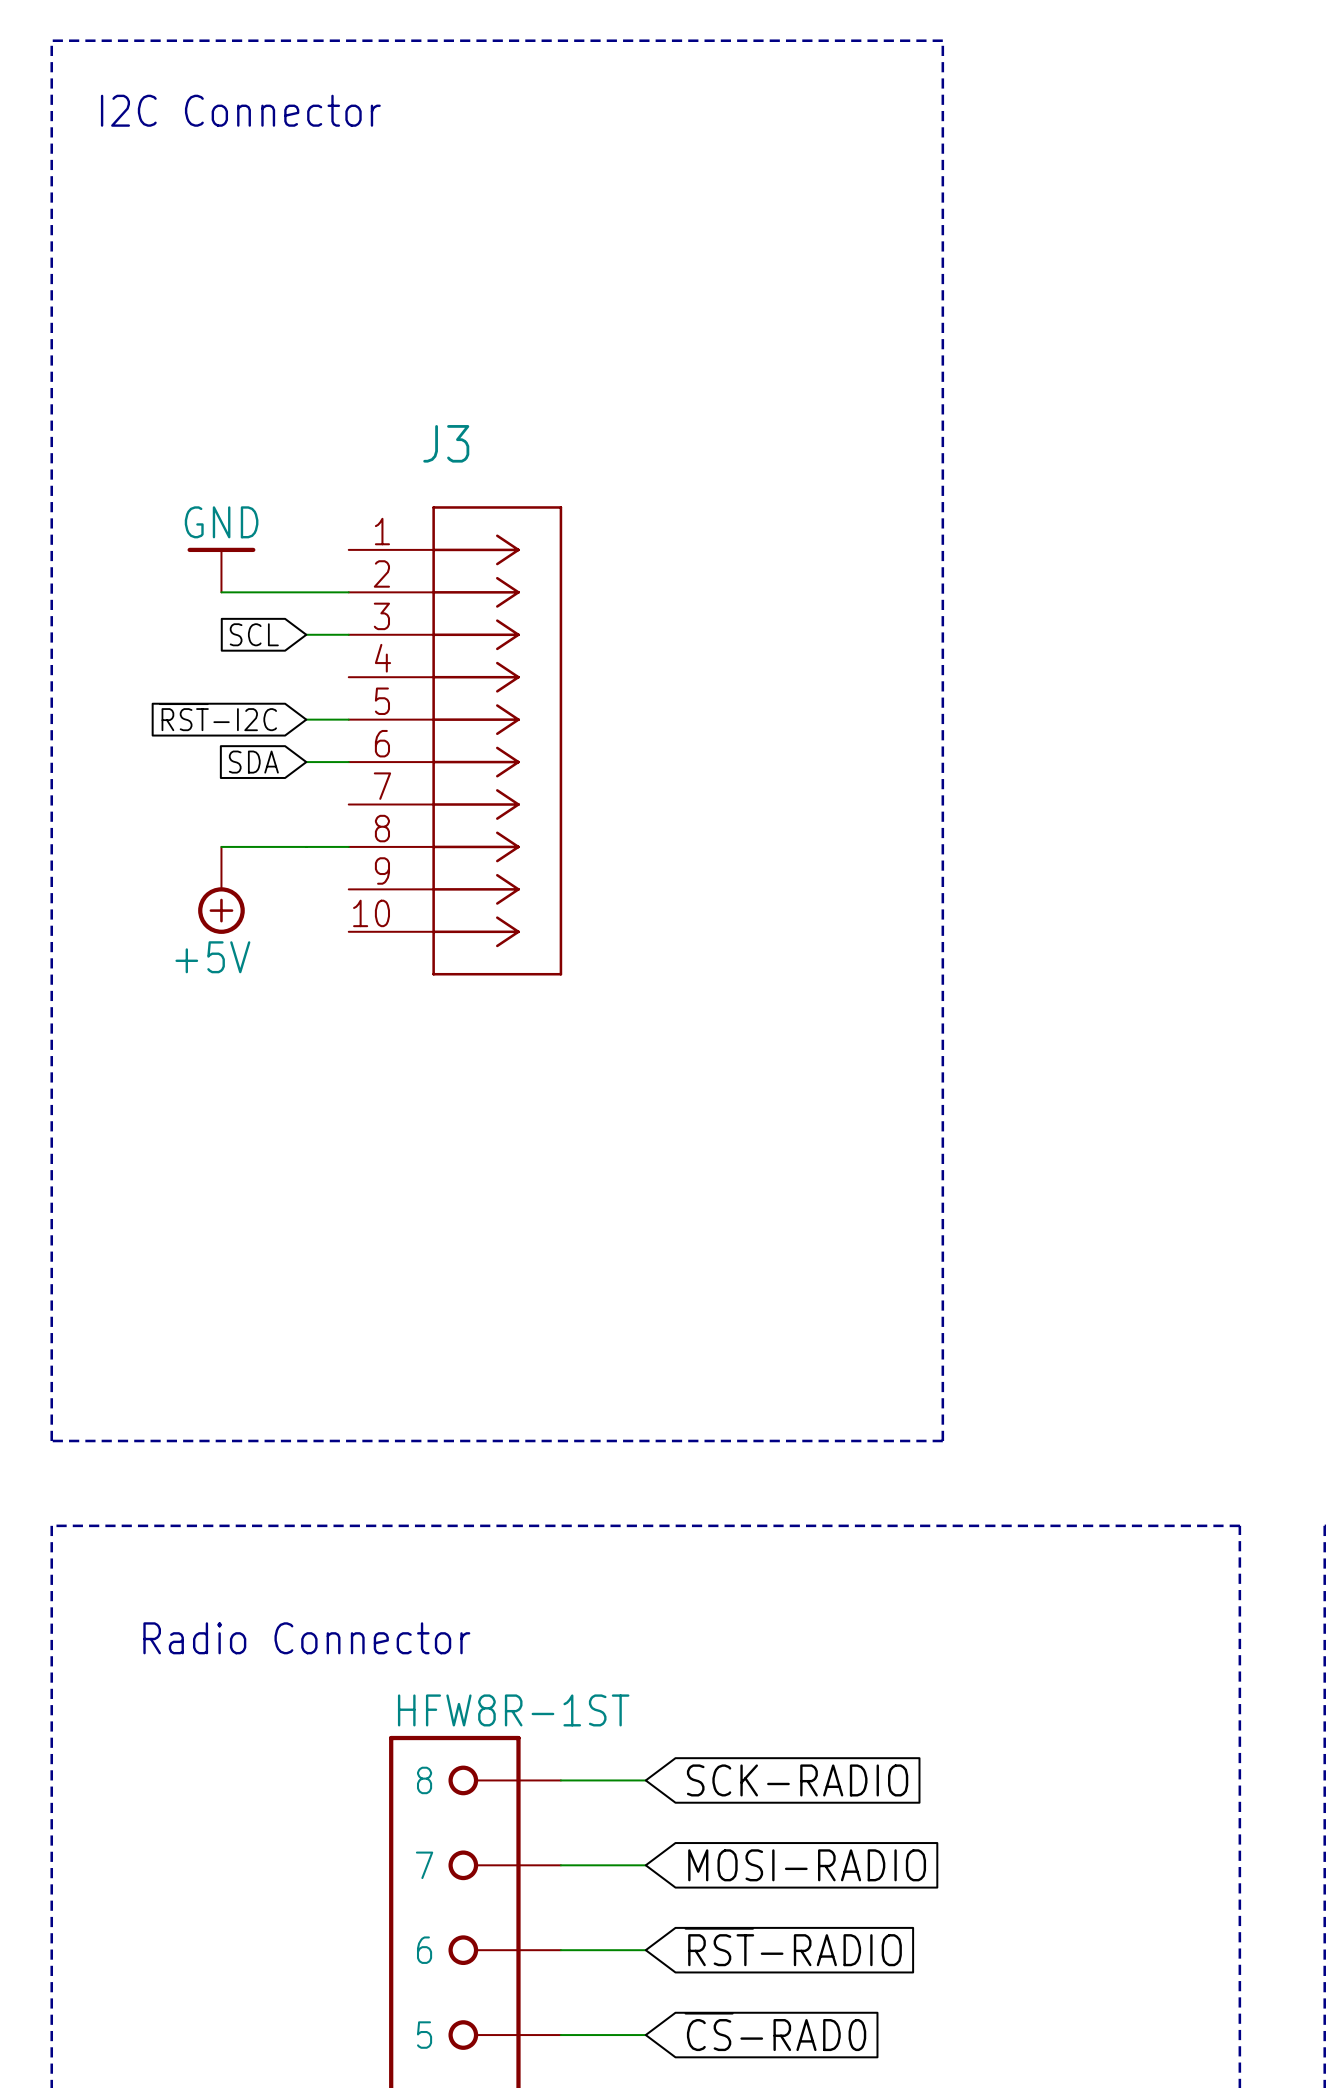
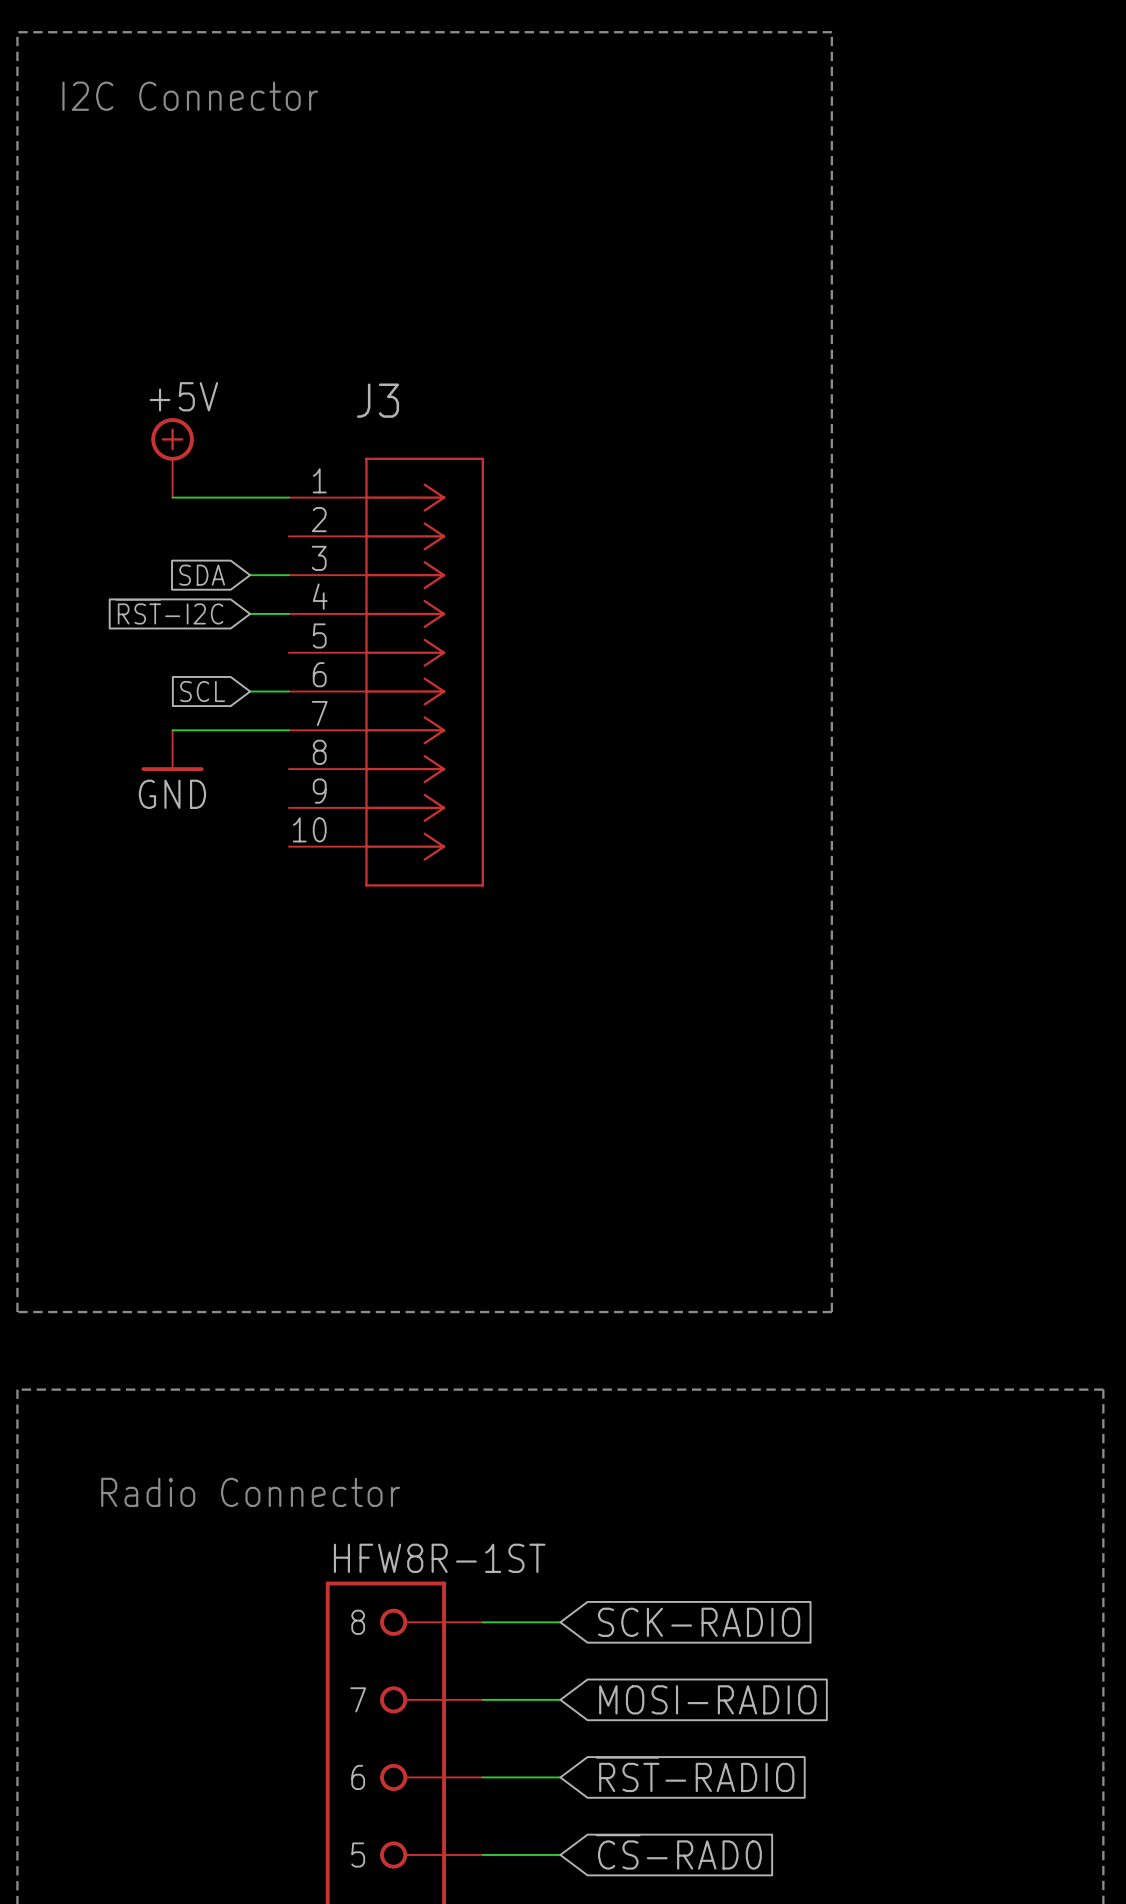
power symbol rotation: 0° (221, 549) -> 180° (172, 769)
power symbol position: GND (221, 570) -> GND (172, 750)
wire: (221, 592) (348, 592) -> (172, 497) (288, 497)
global label: SCL (254, 634) -> SDA (202, 575)
global label position: ~{RST}-I2C (217, 717) -> ~{RST}-I2C (169, 611)
wire: (306, 719) (348, 719) -> (250, 613) (288, 613)
global label: SDA (253, 762) -> SCL (202, 691)
wire: (221, 846) (348, 846) -> (172, 730) (288, 730)
power symbol position: +5V (221, 890) -> +5V (172, 457)
power symbol rotation: 0° (221, 910) -> 180° (172, 439)

